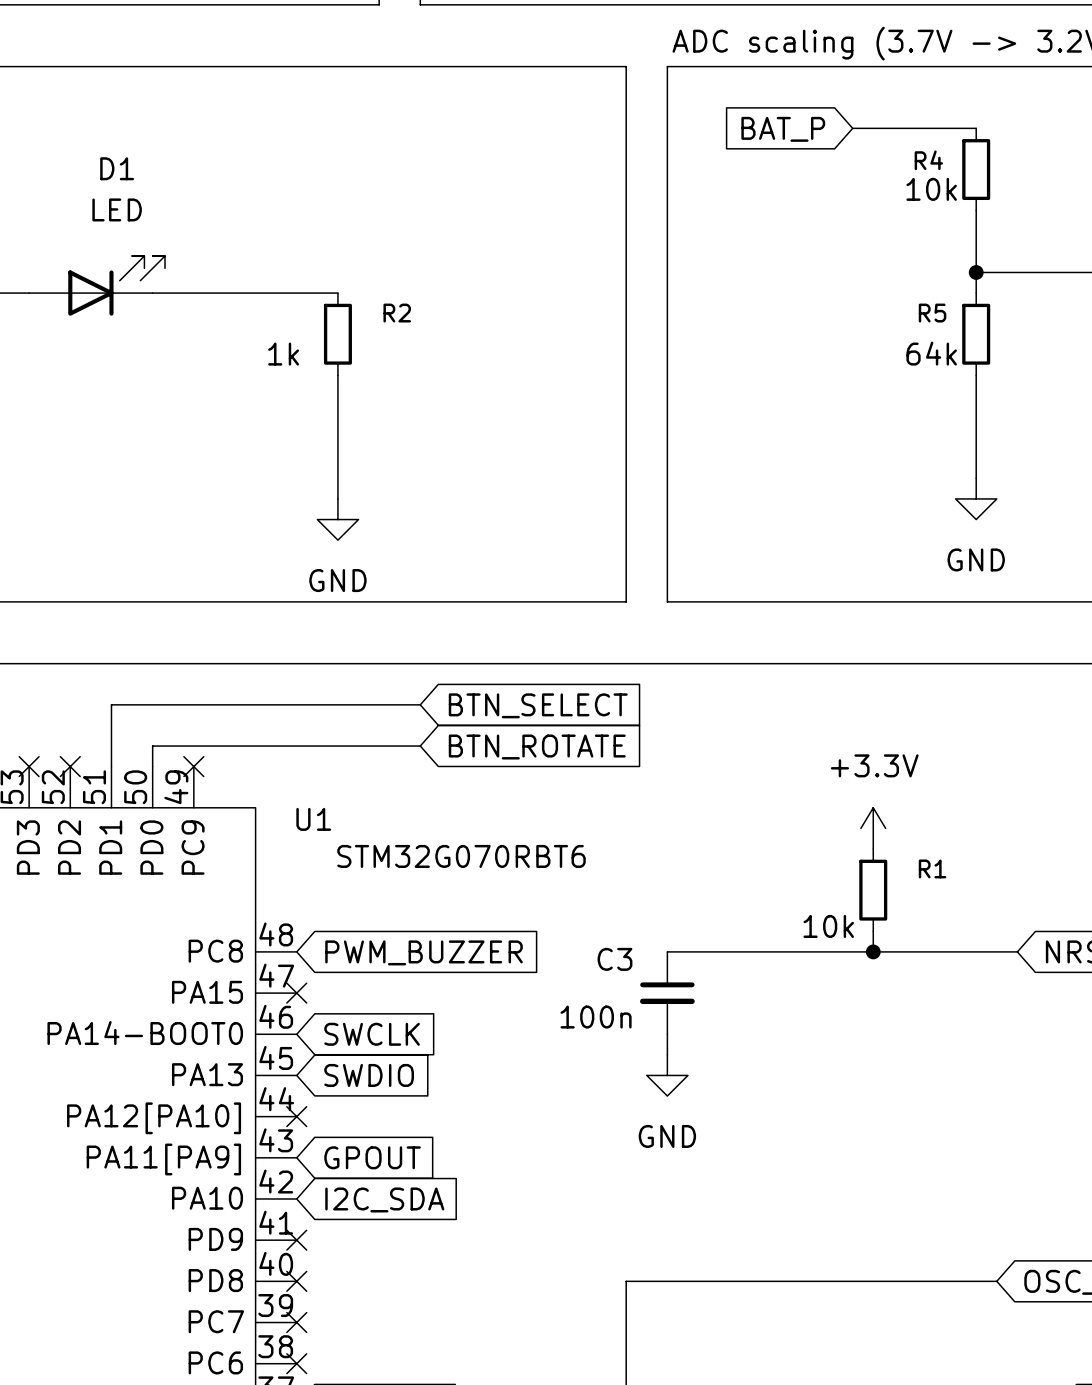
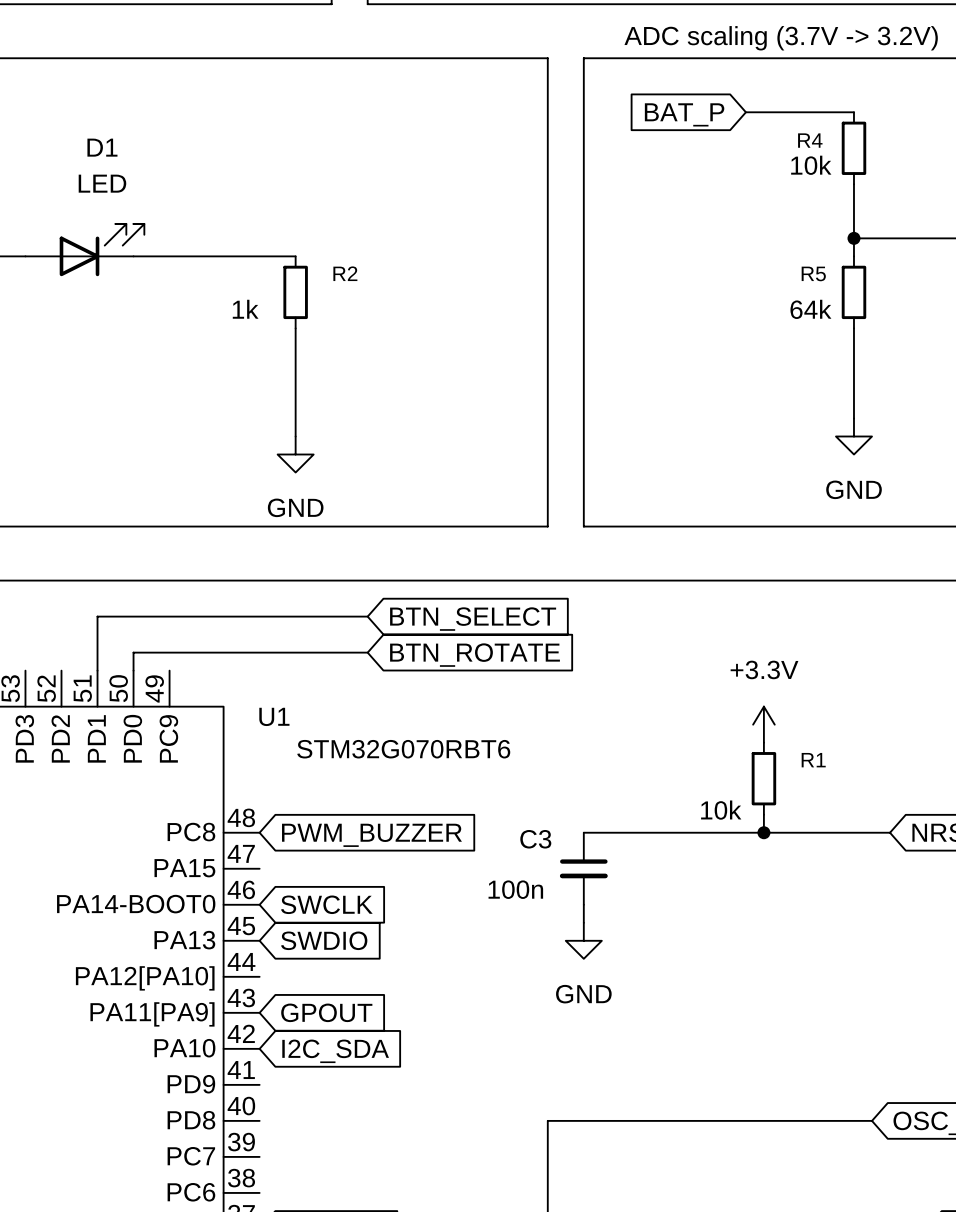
no-connect mark: (29, 766) -> none
no-connect mark: (70, 766) -> none
no-connect mark: (193, 766) -> none
no-connect mark: (296, 993) -> none
no-connect mark: (296, 1116) -> none
no-connect mark: (296, 1240) -> none
no-connect mark: (296, 1281) -> none
no-connect mark: (296, 1322) -> none
no-connect mark: (296, 1363) -> none

